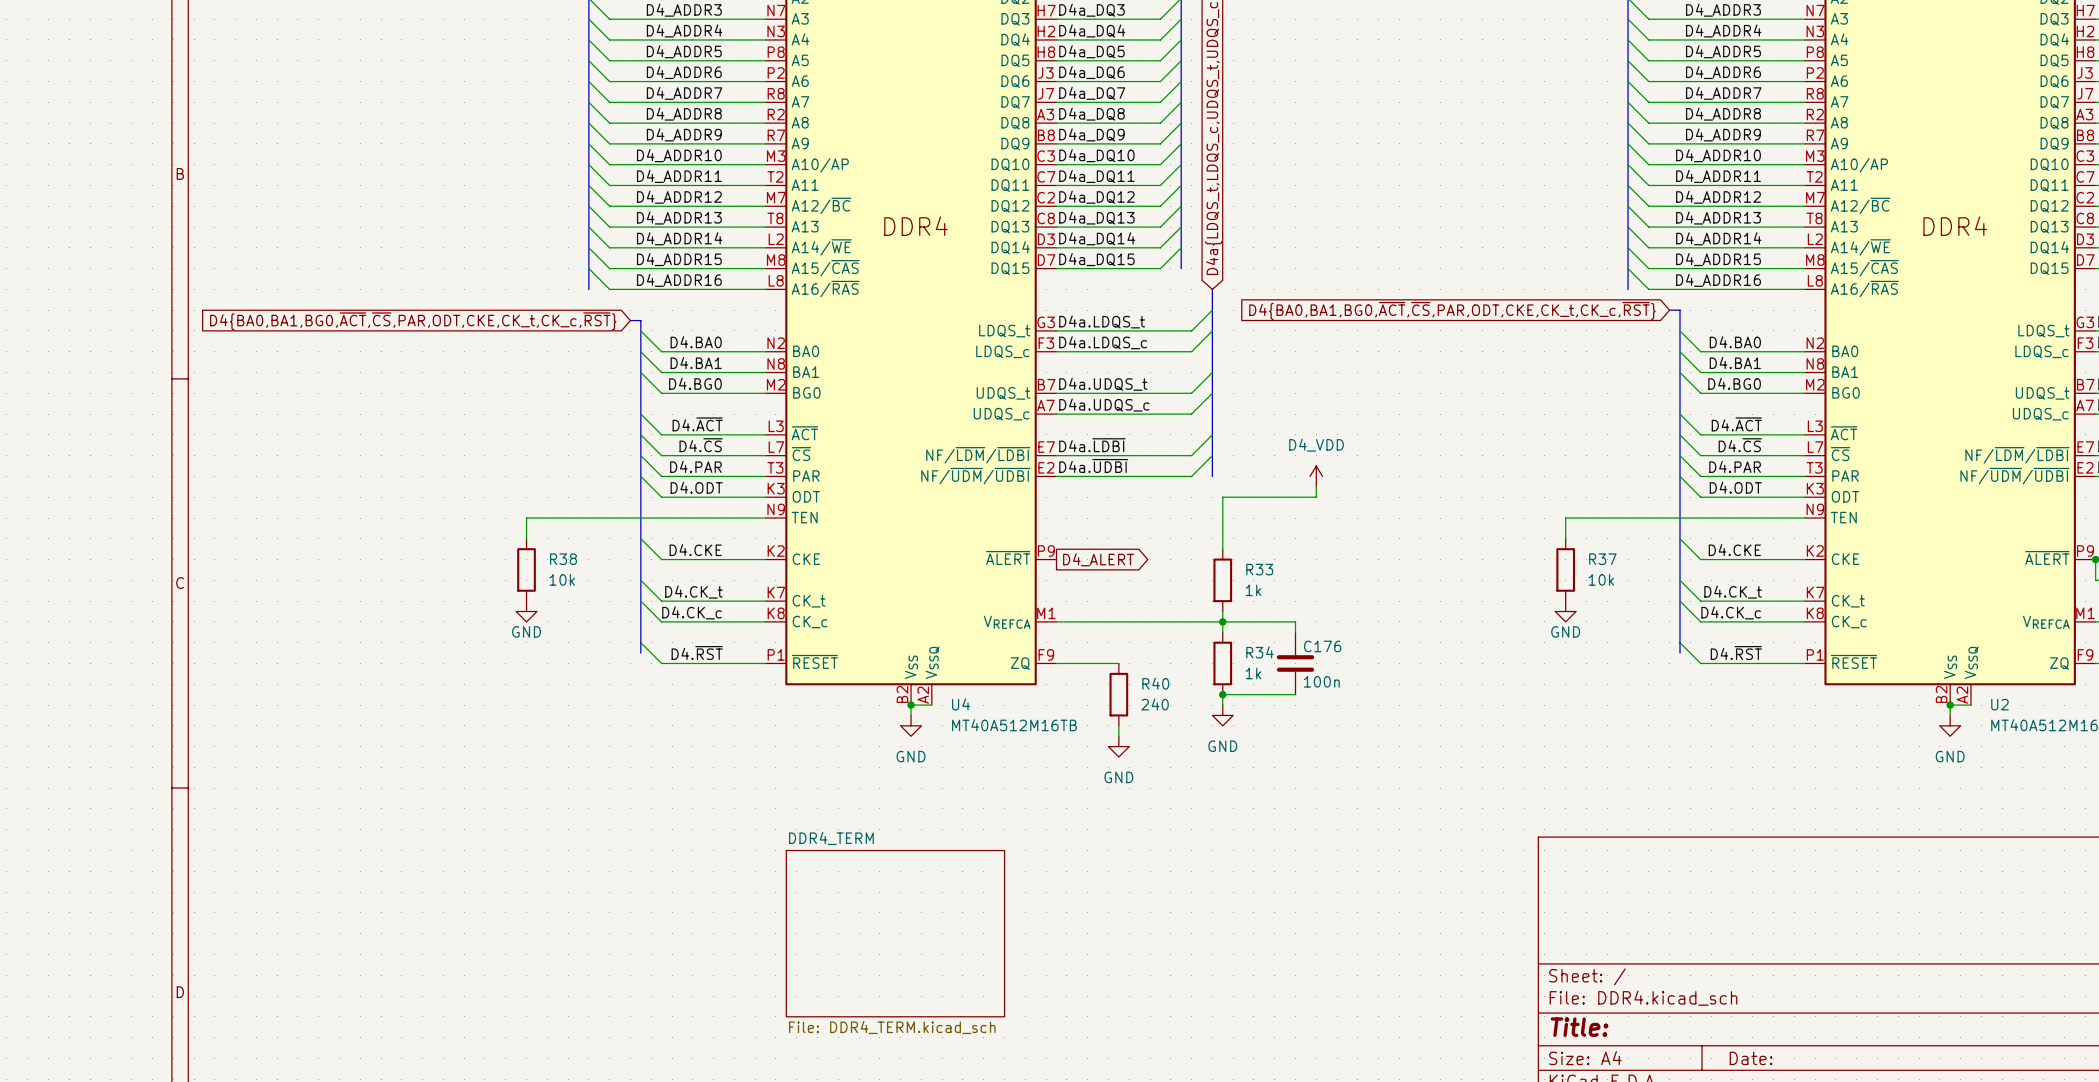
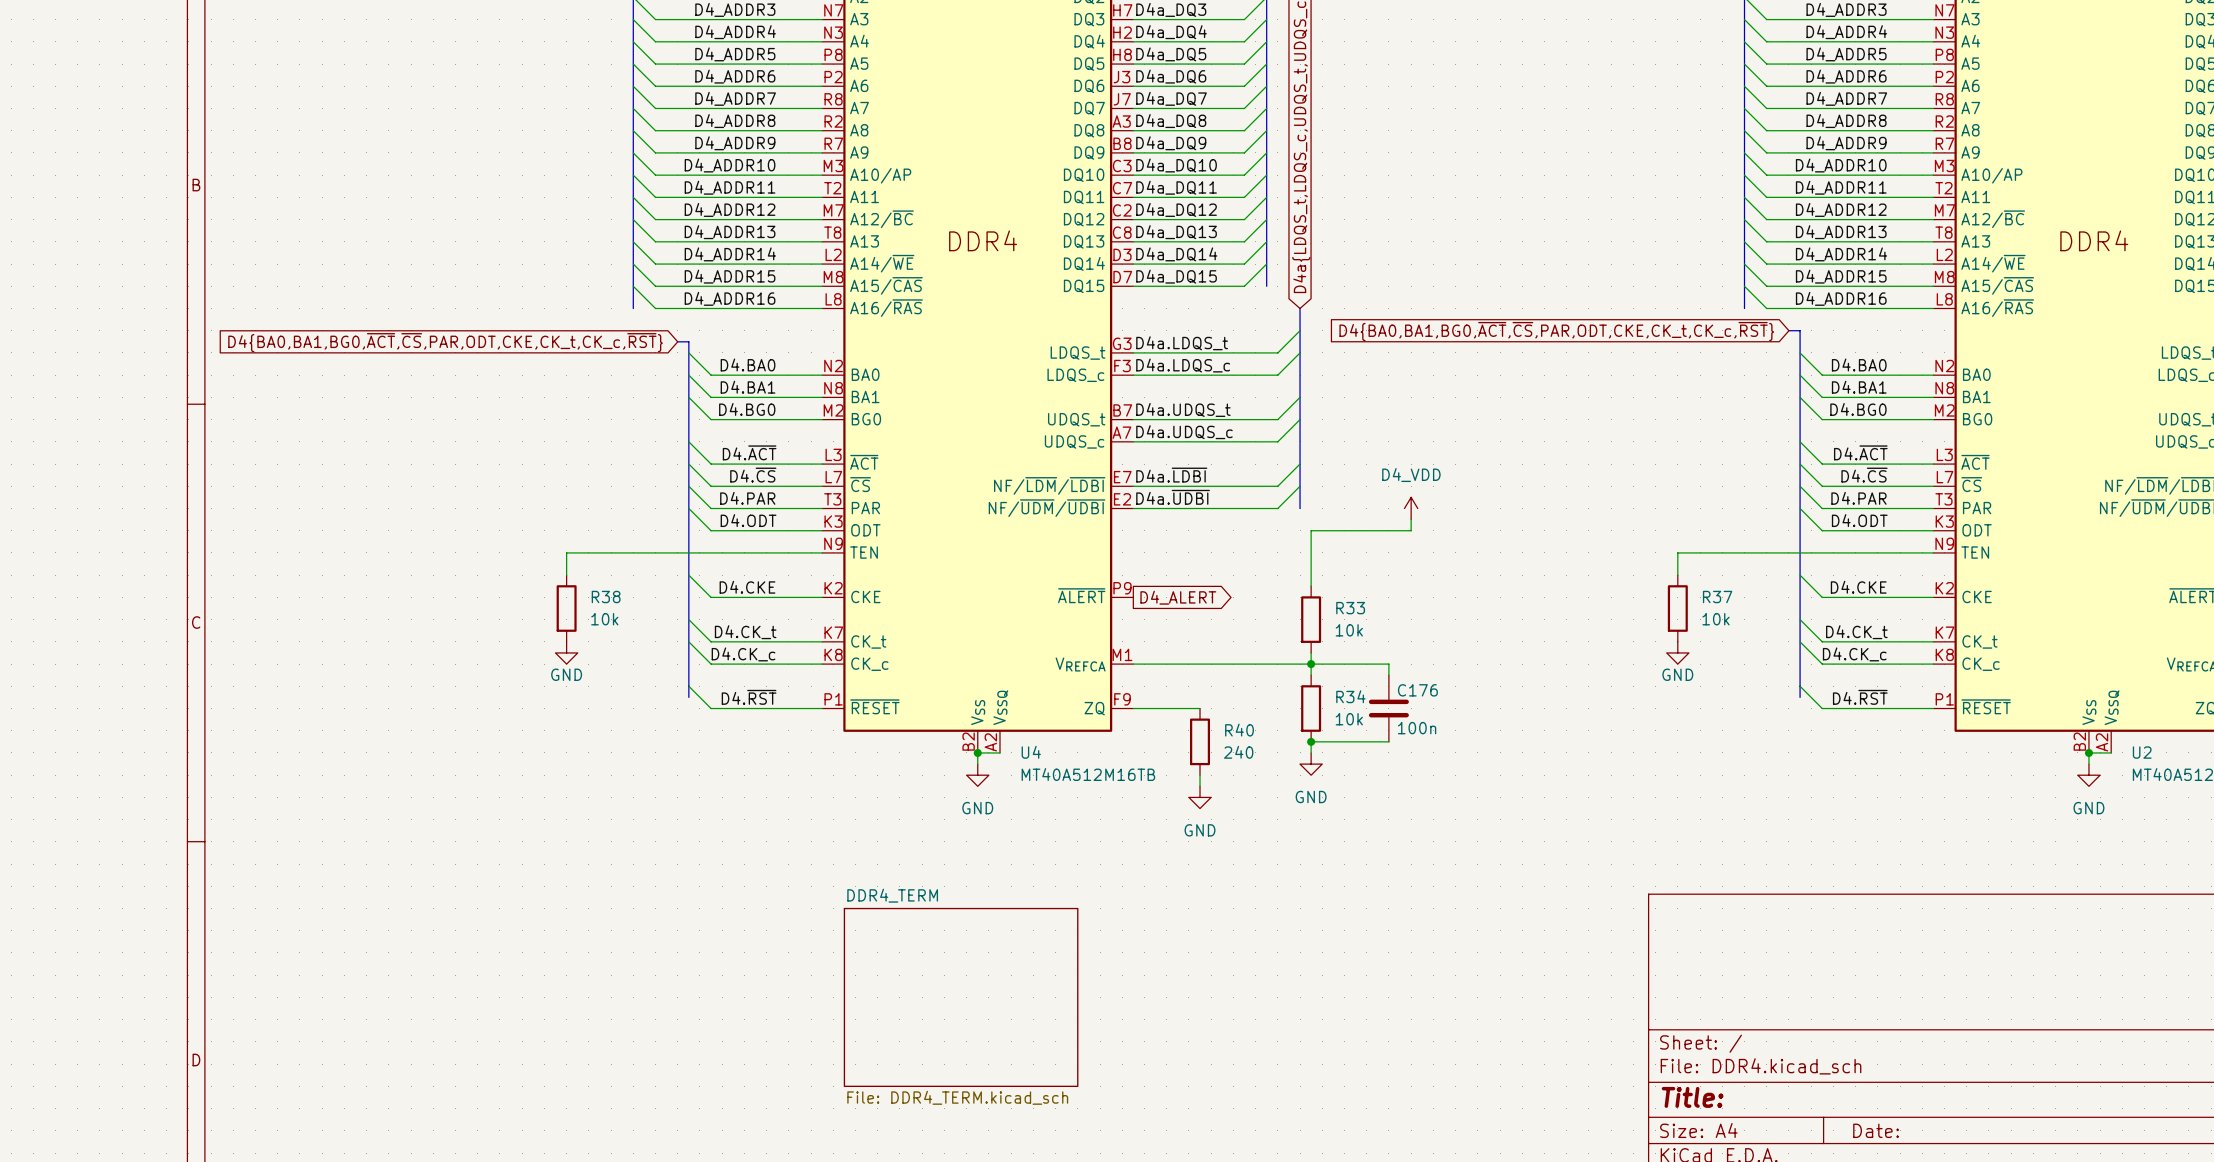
R33 value: 1k (1253, 590) -> 10k (1349, 630)
R34 value: 1k (1253, 673) -> 10k (1349, 719)

